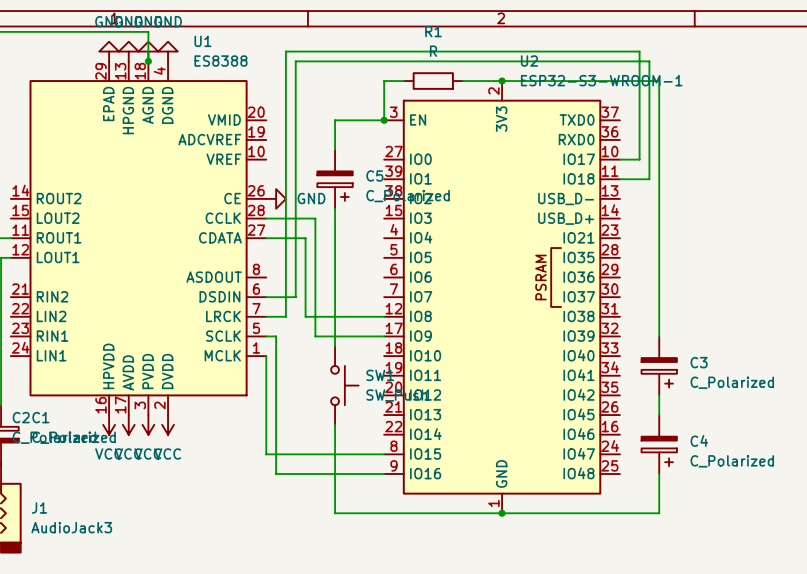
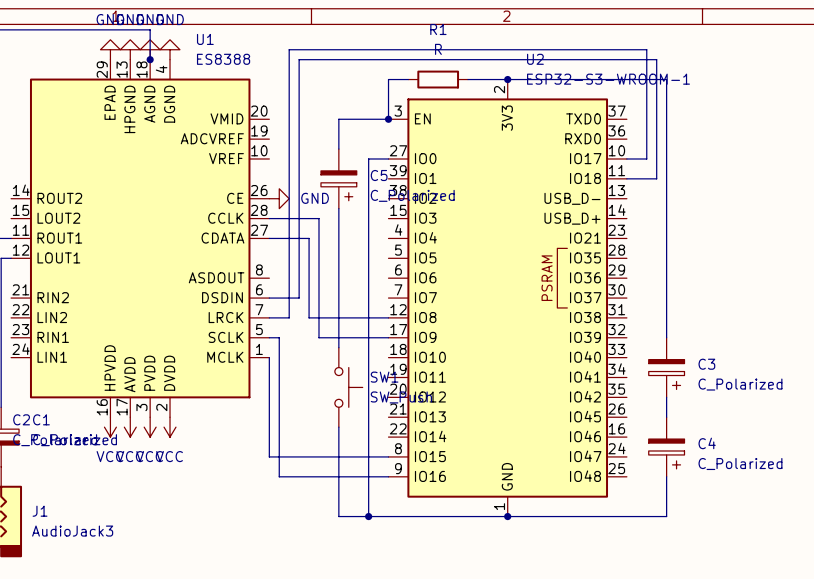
wire: none -> (388, 158) (368, 158) (368, 516)
junction: none -> (368, 516)

